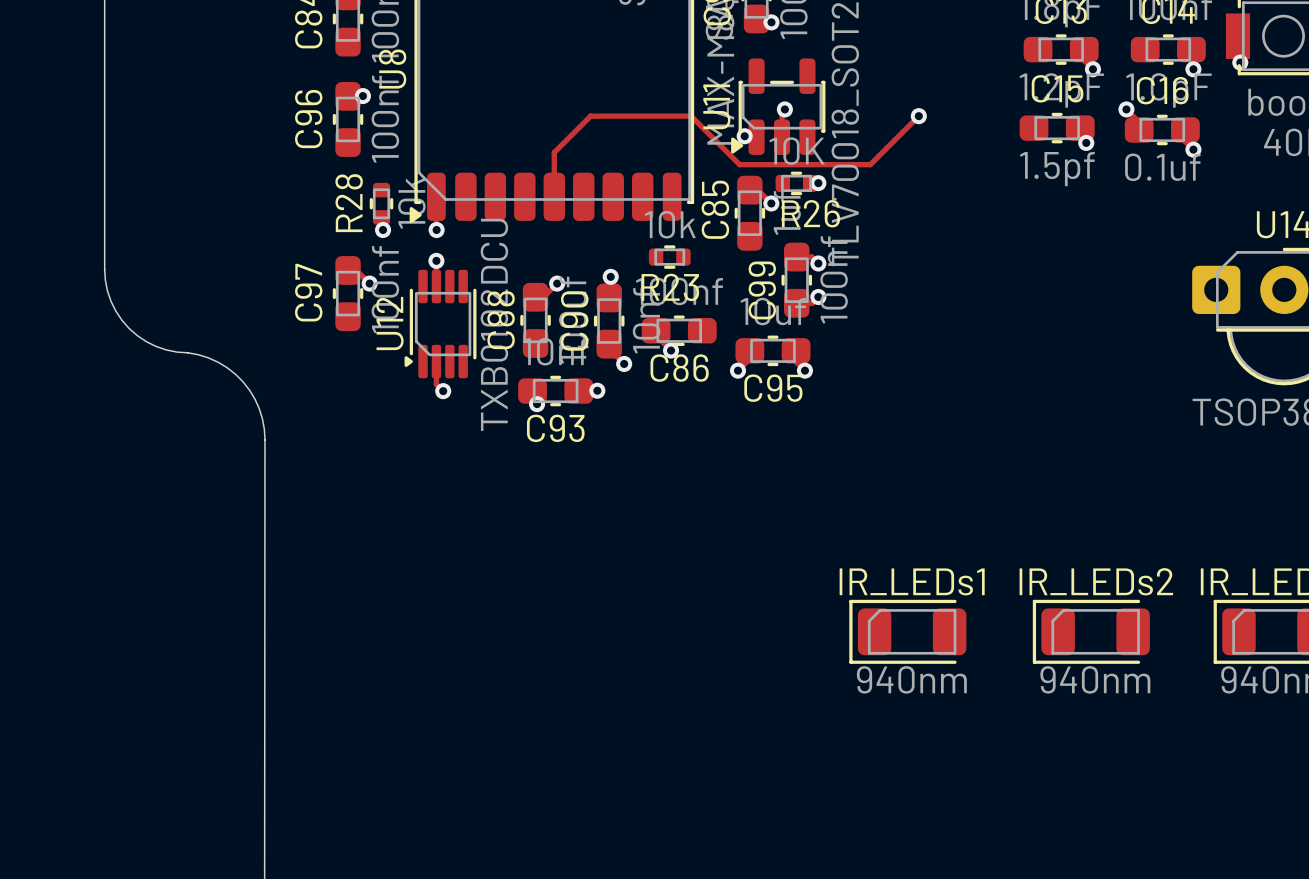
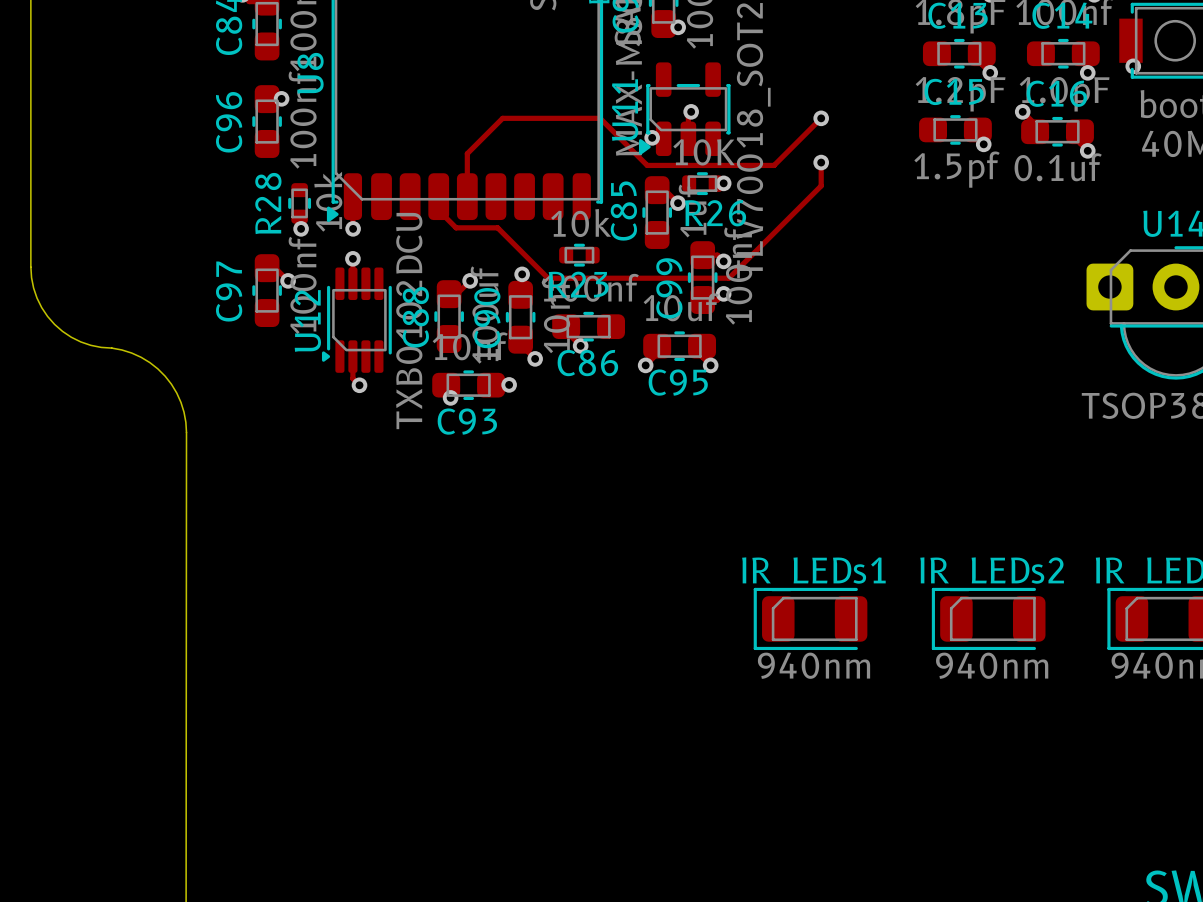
track: none -> (821, 162) (821, 185) (728, 278) (548, 278) (497, 227) (456, 227) (438, 210) (438, 196)
via: none -> (821, 162)

